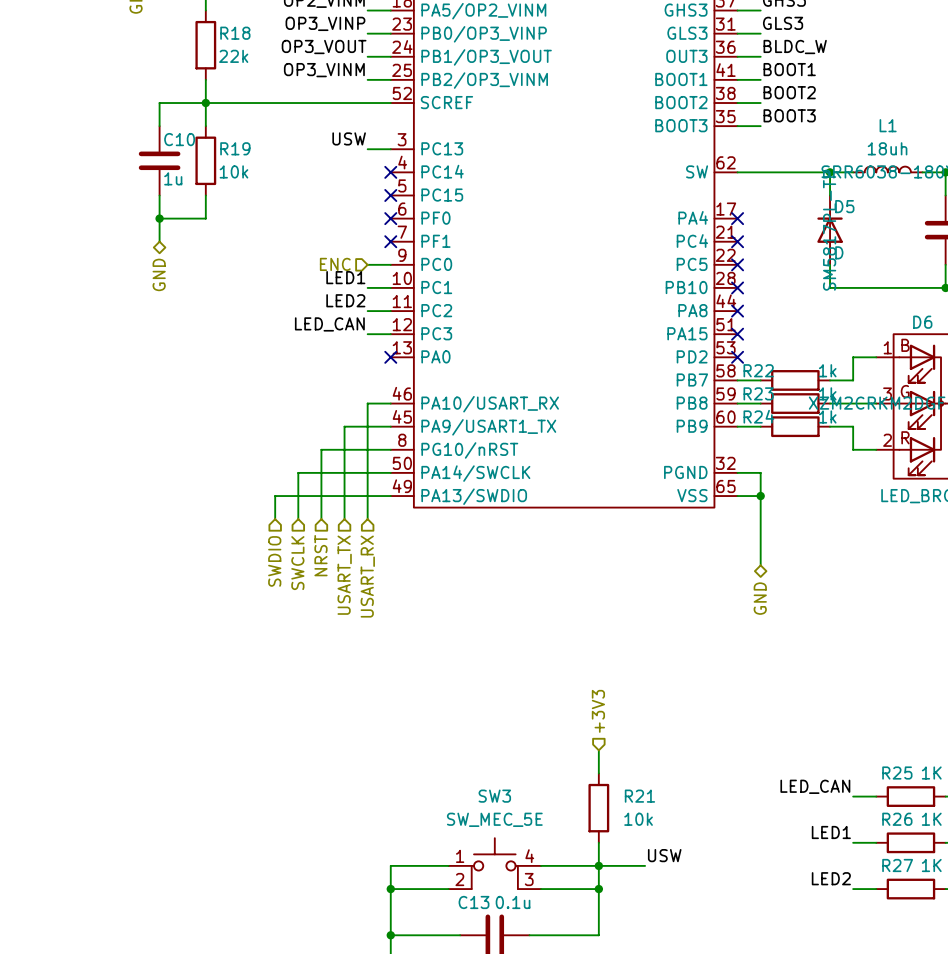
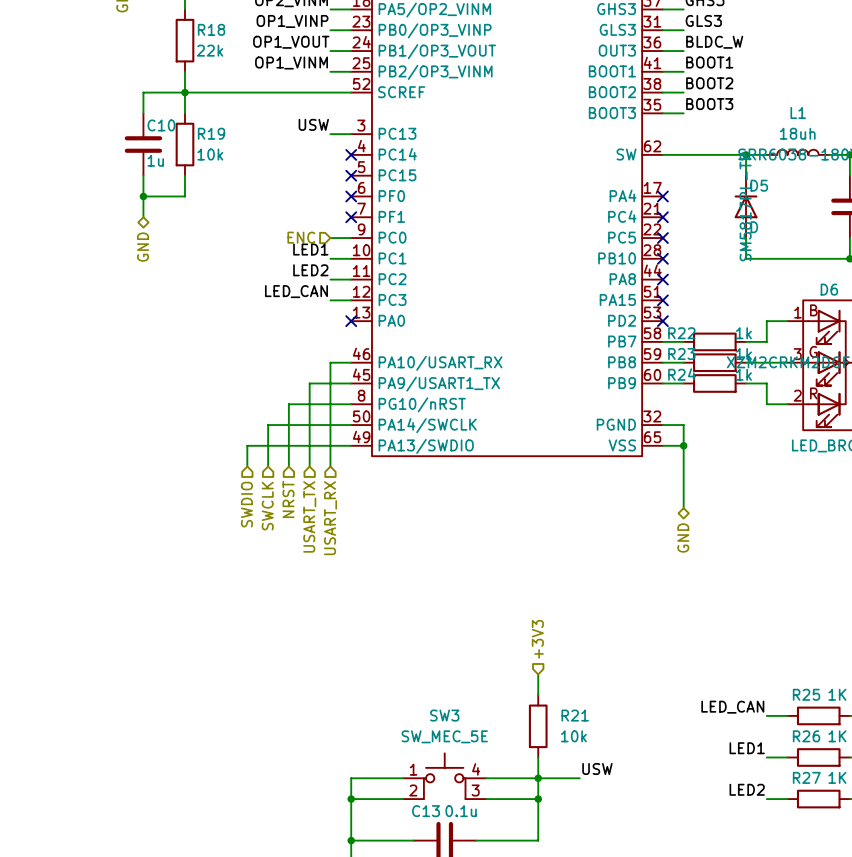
label: OP3_VINP (325, 23) -> OP1_VINP (292, 21)
label: OP3_VOUT (324, 47) -> OP1_VOUT (291, 42)
label: OP3_VINM (324, 70) -> OP1_VINM (291, 63)

